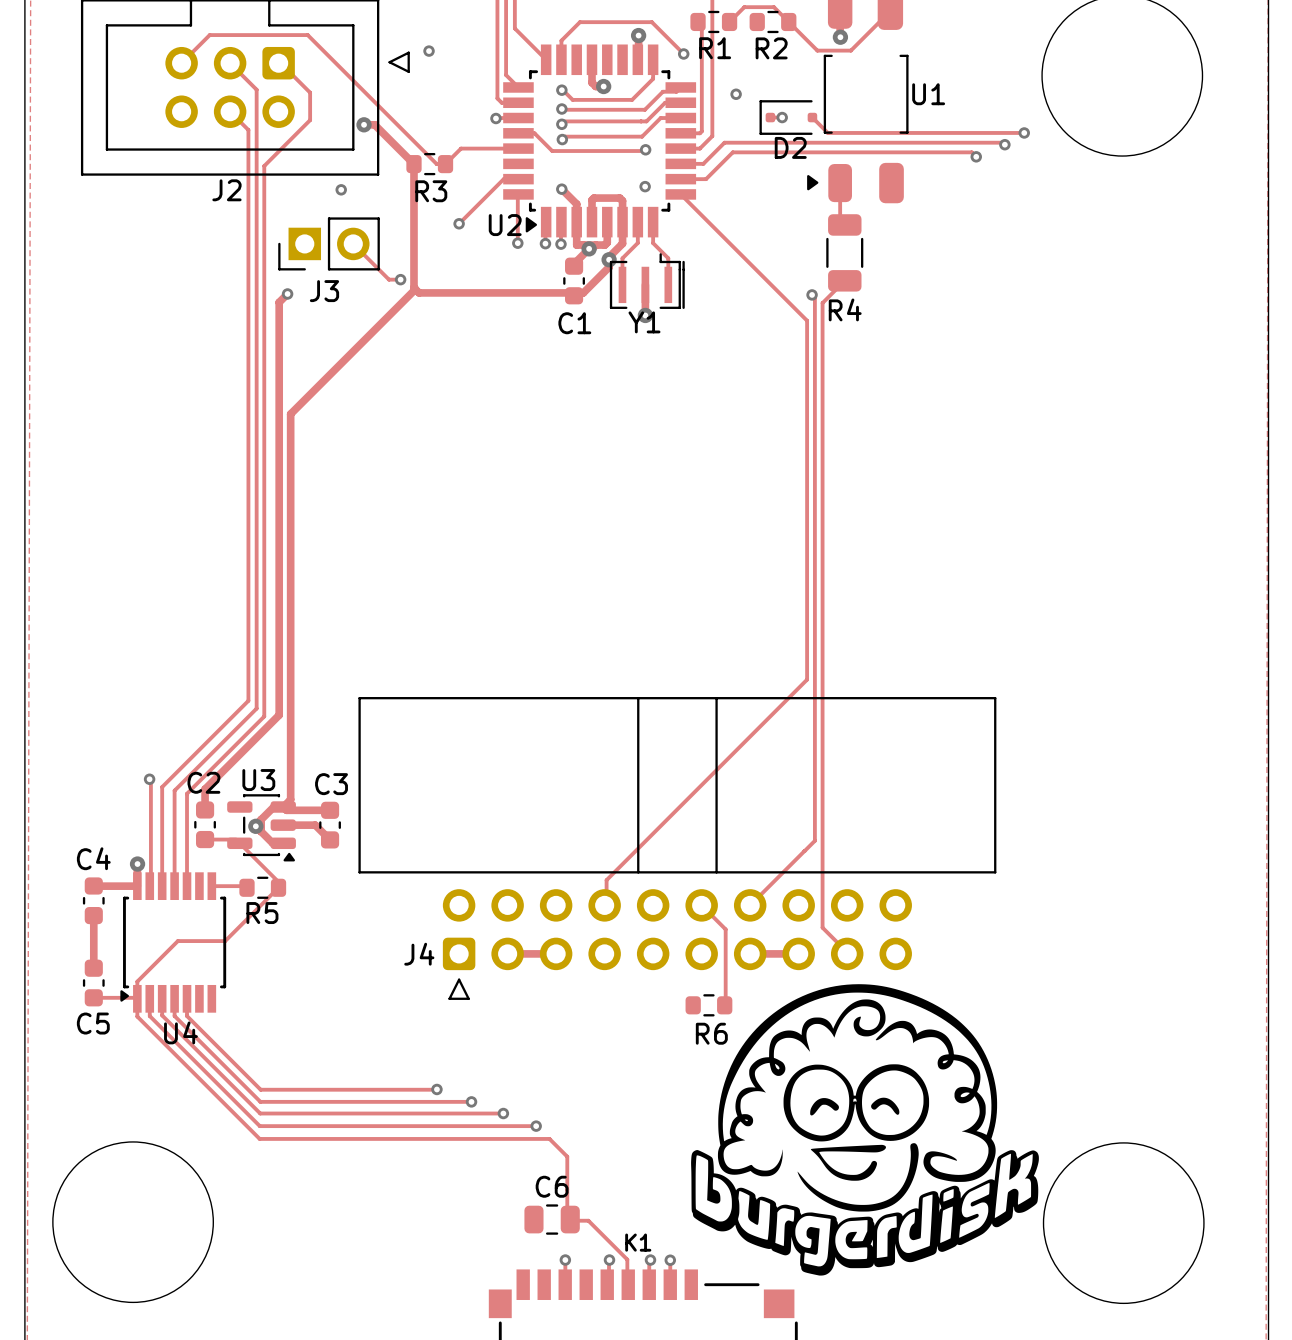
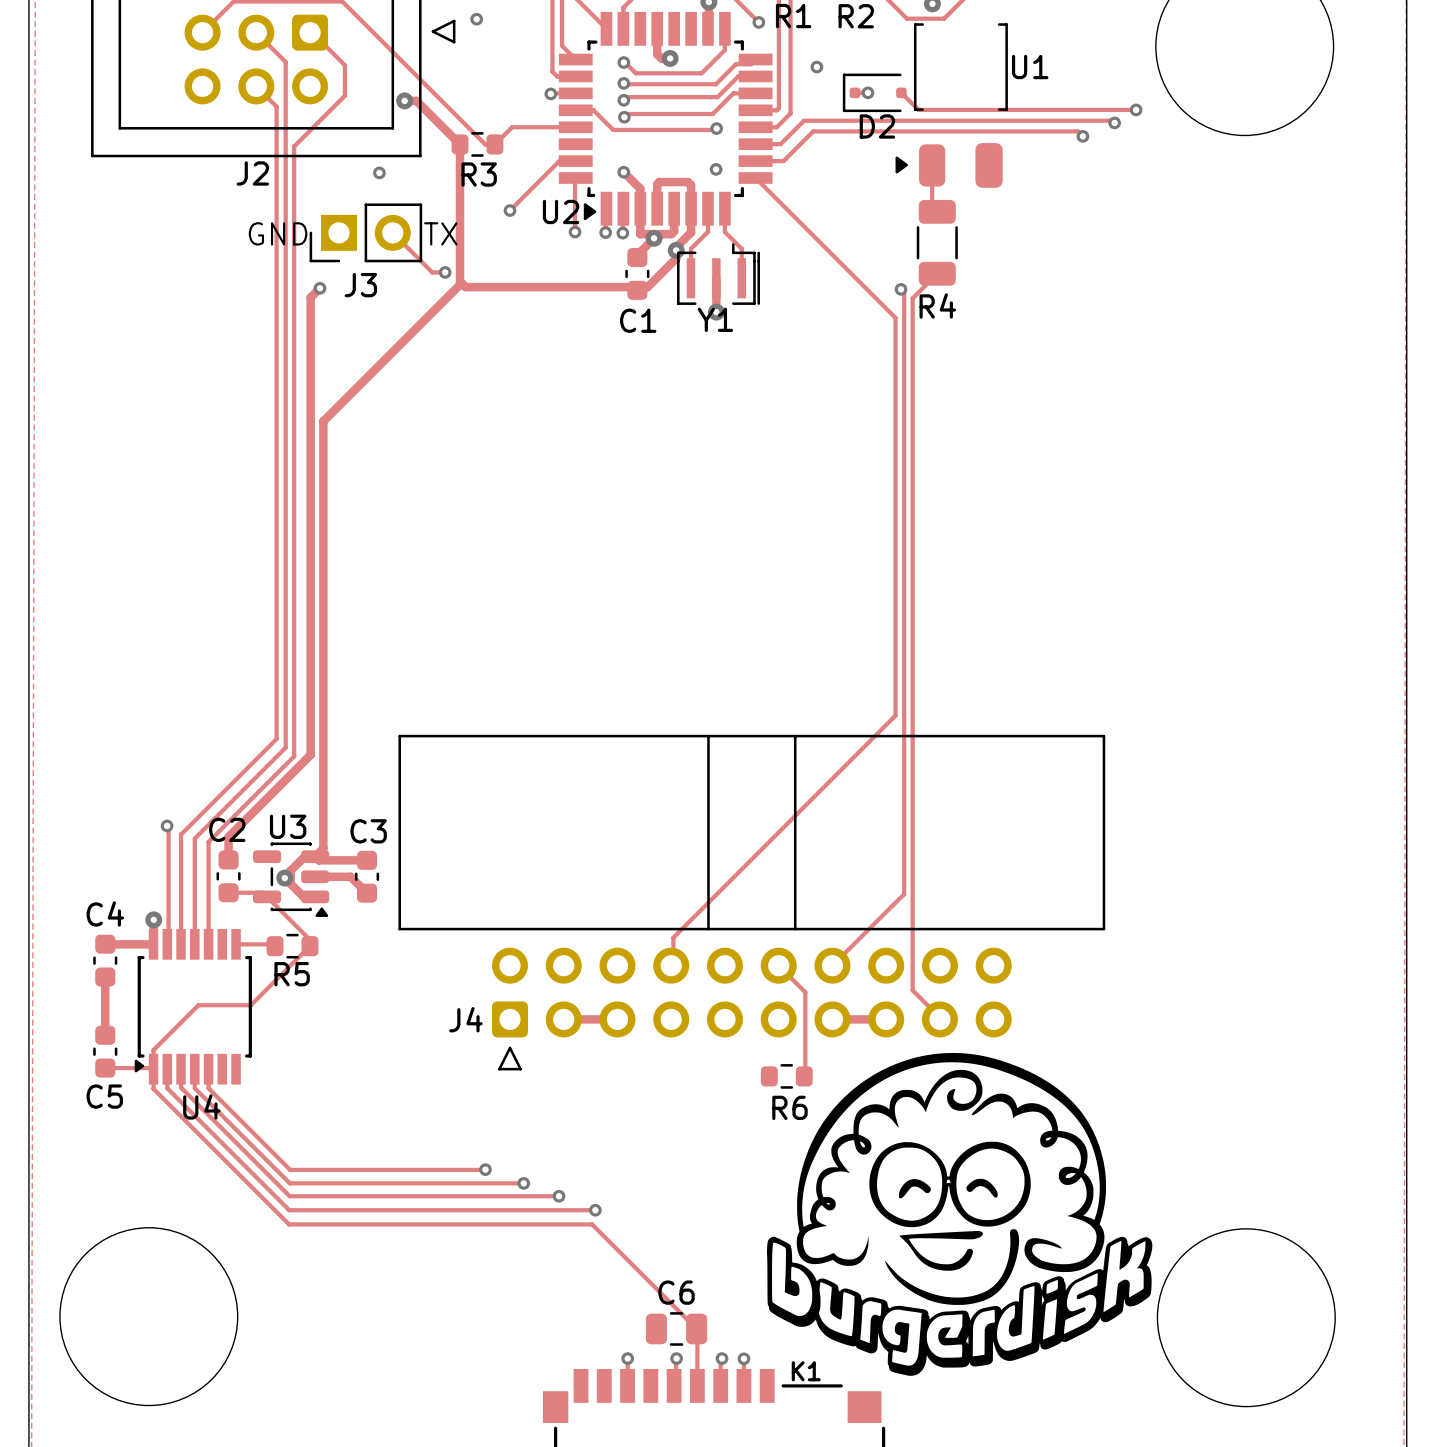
text: none -> GND TX (353, 233)
track: (533, 1138) (549, 1138) (567, 1156) (567, 1220) (588, 1220) (627, 1259) (627, 1283) -> (592, 1224) (697, 1329) (697, 1385)
C6 position: (552, 1219) -> (676, 1328)
K1 name position: K1 (638, 1242) -> K1 (806, 1371)

